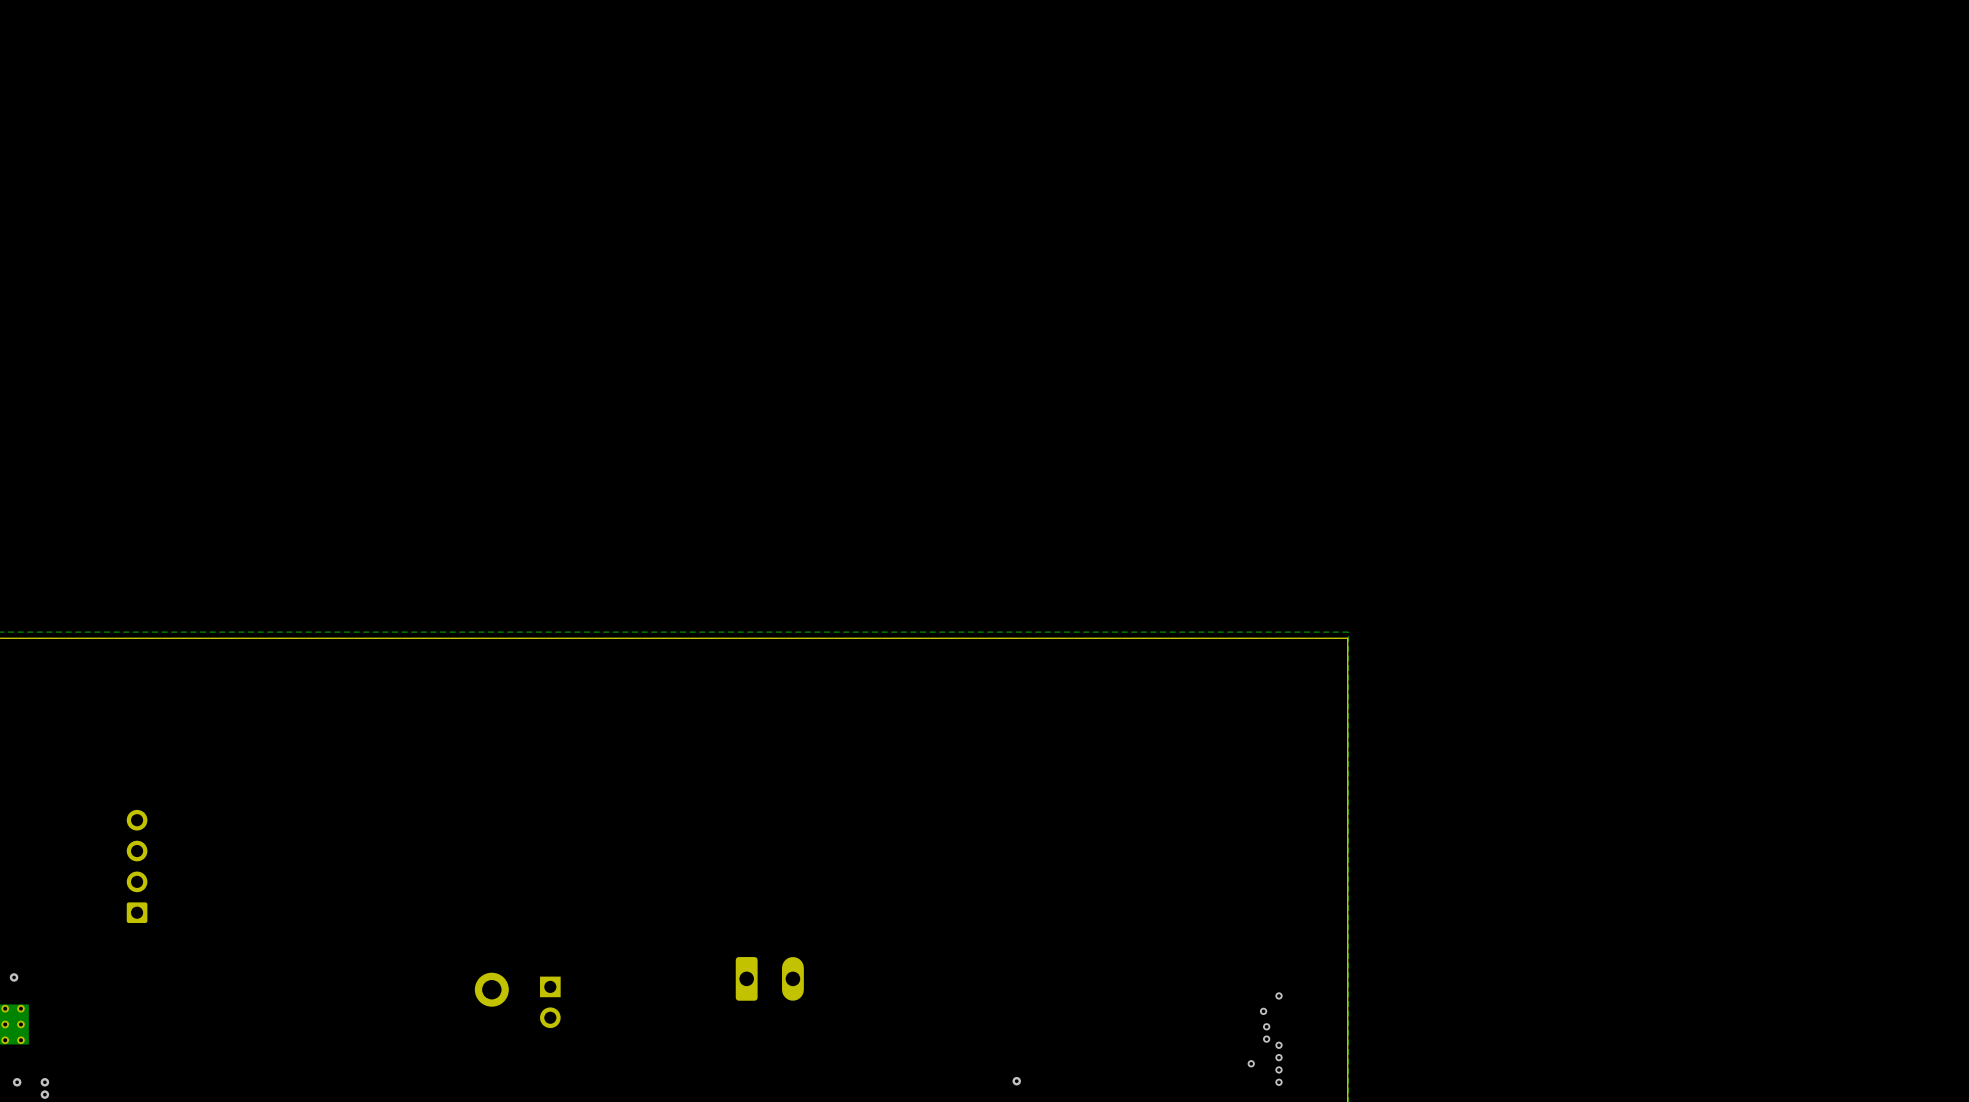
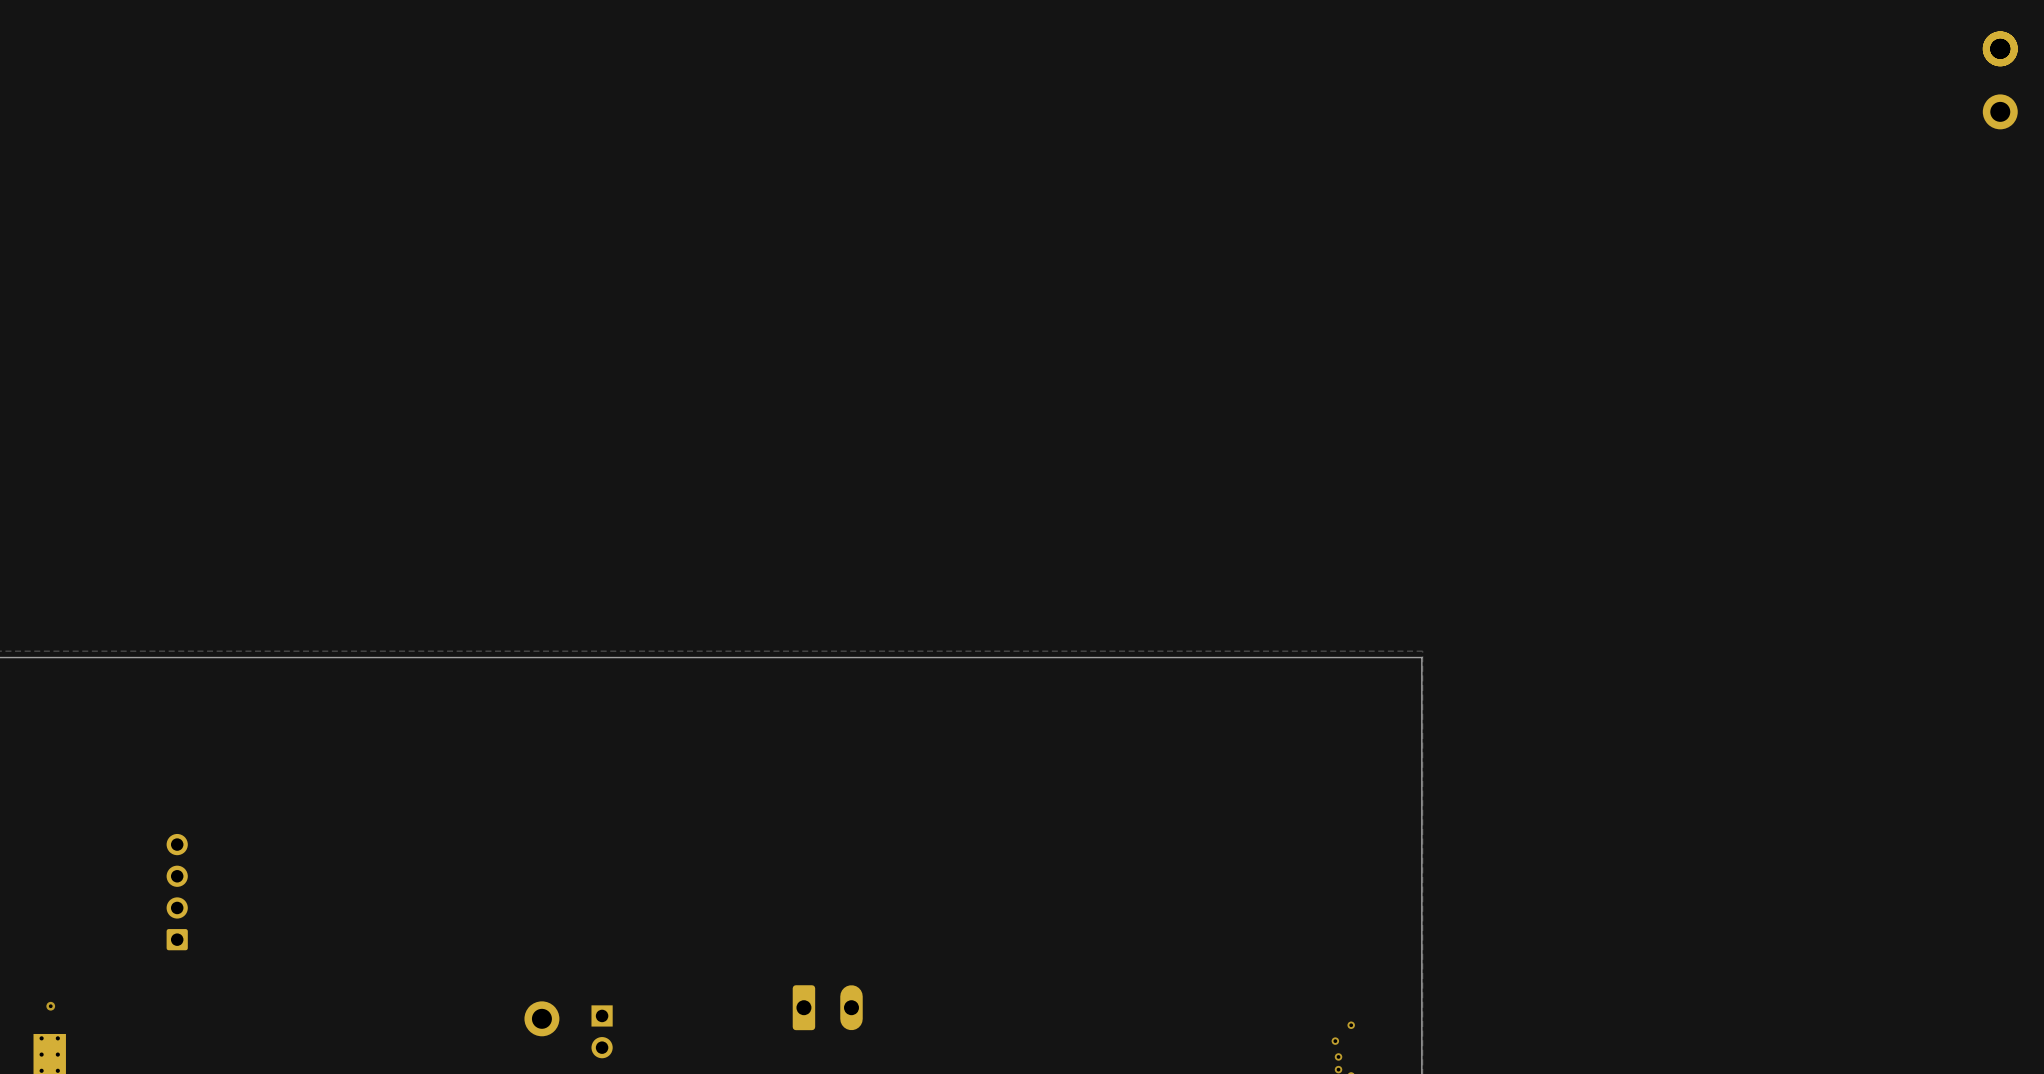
part: none -> (2000, 48)
part: none -> (2000, 111)

